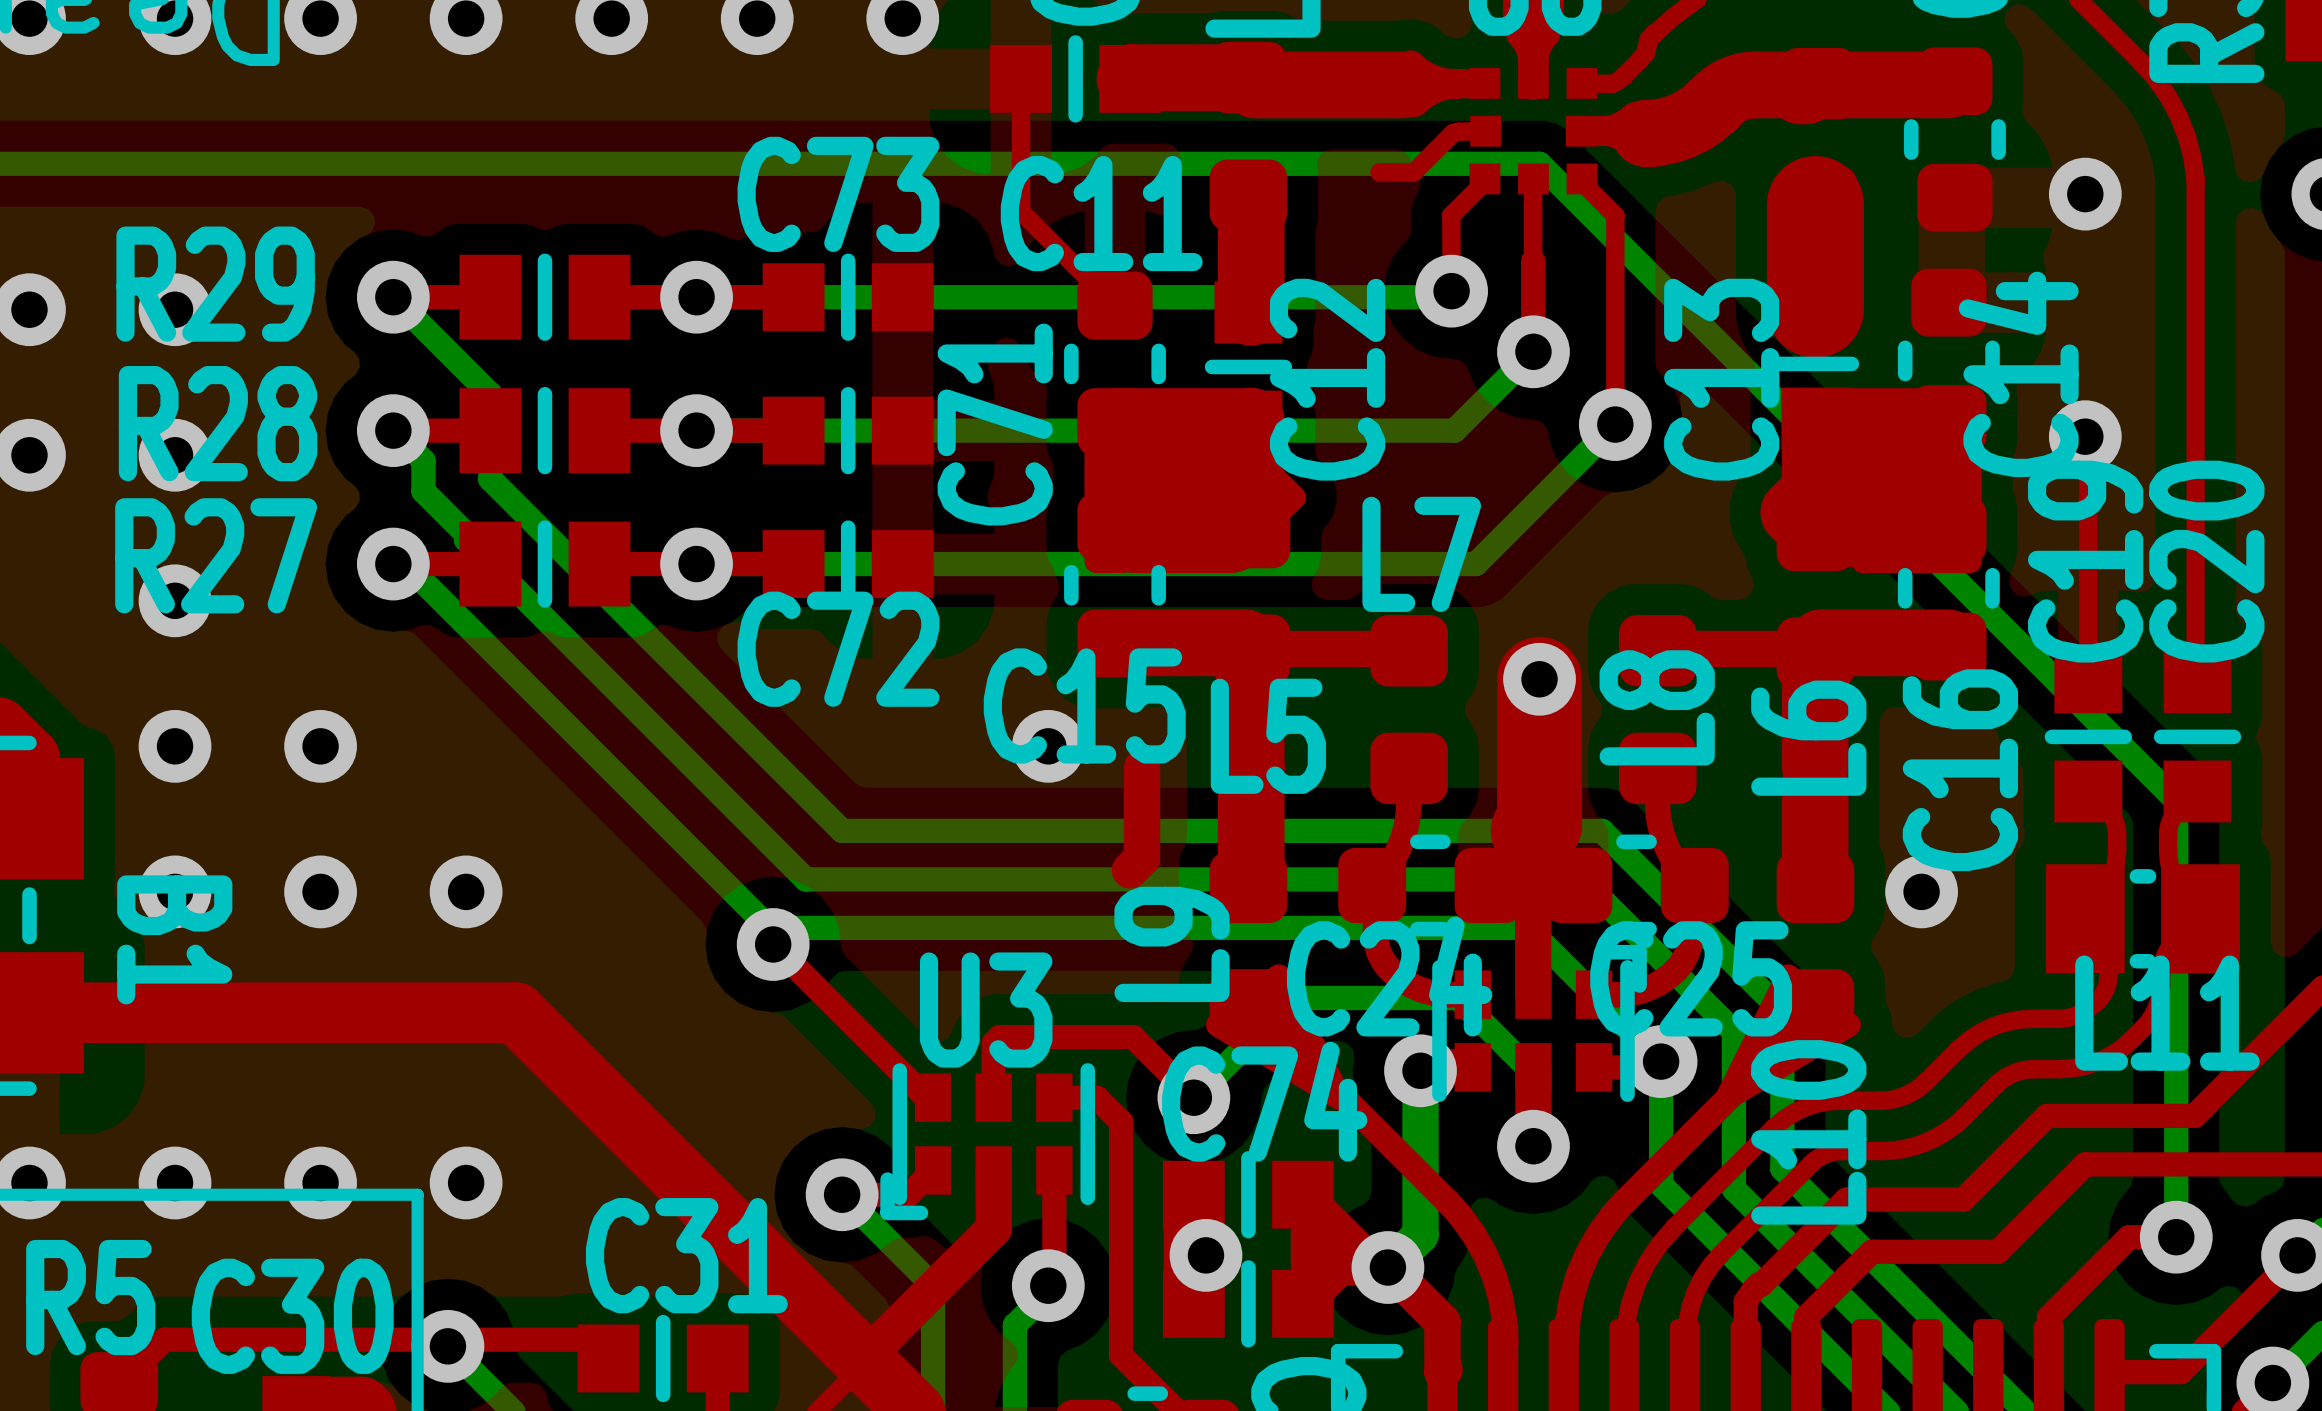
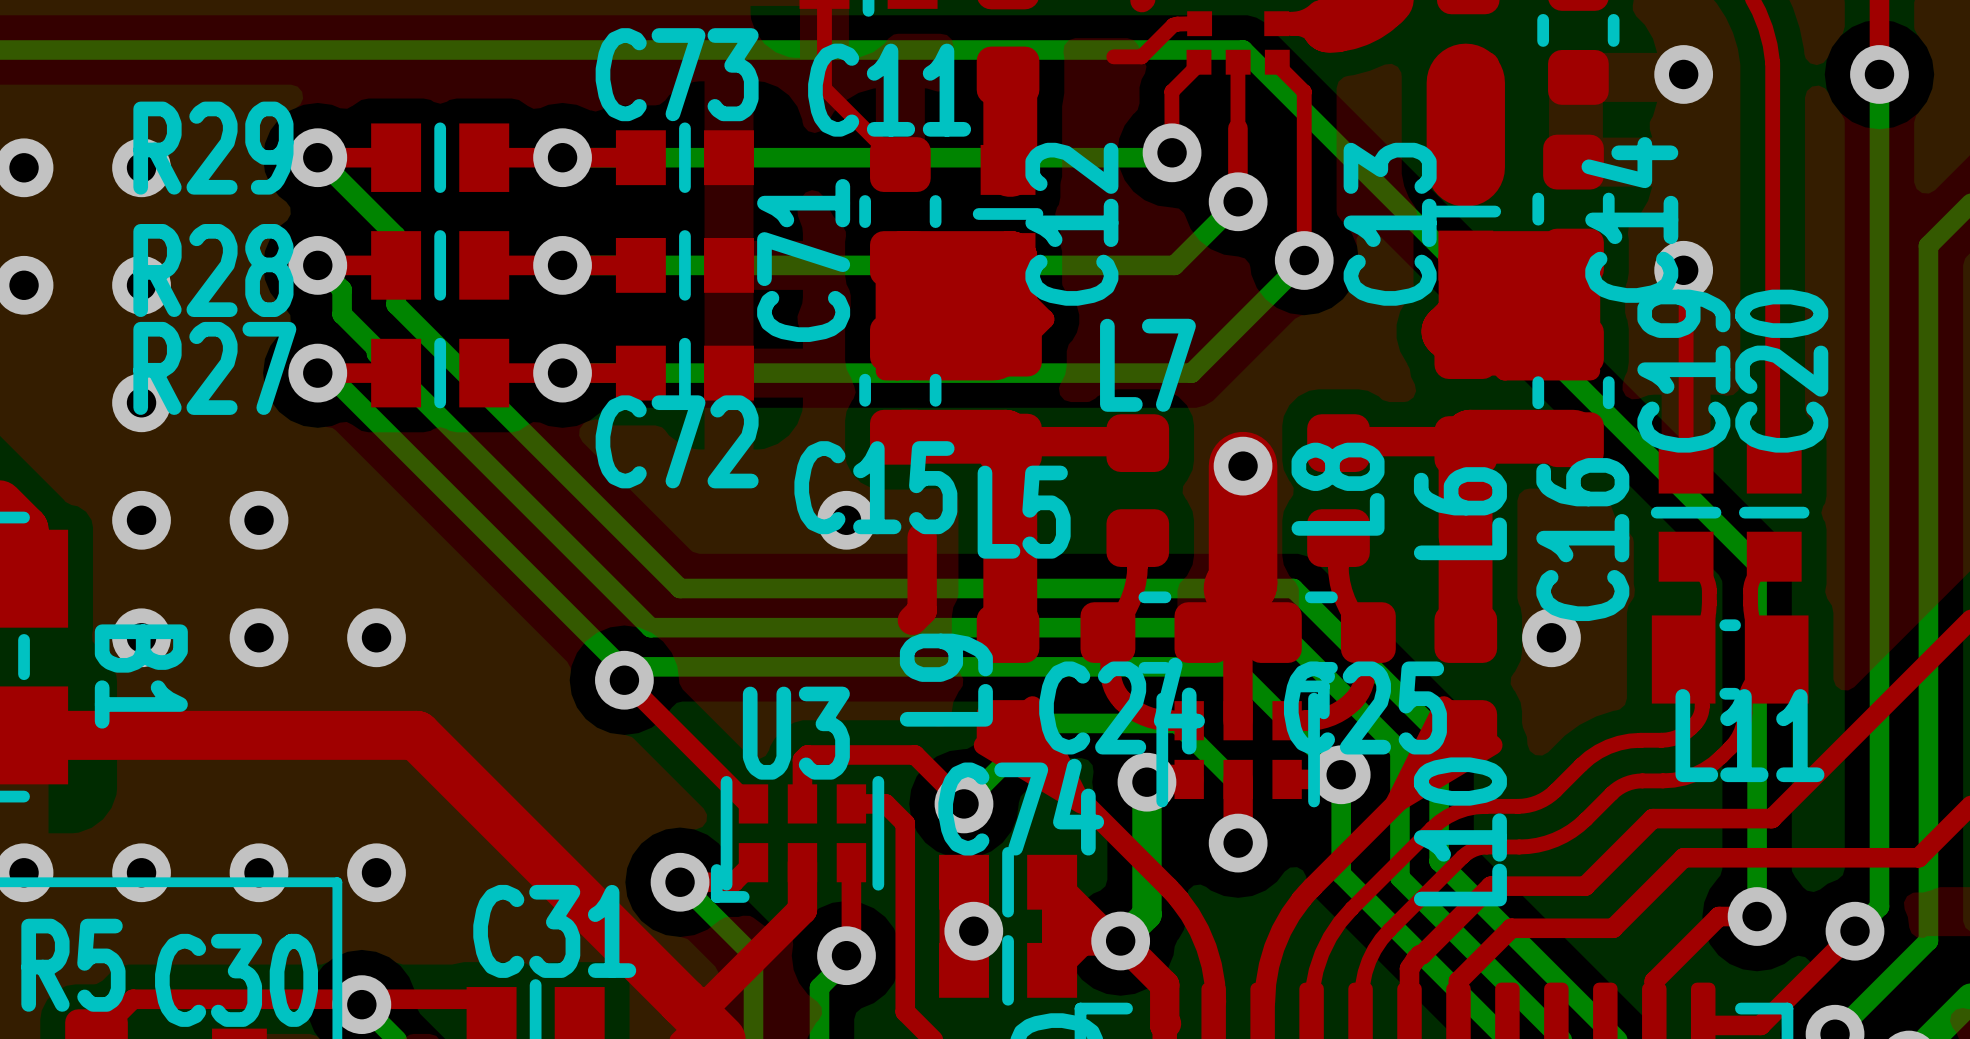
R29 name position: R29 (215, 284) -> R29 (213, 148)
R28 name position: R28 (218, 423) -> R28 (213, 270)
R27 name position: R27 (216, 555) -> R27 (214, 368)

